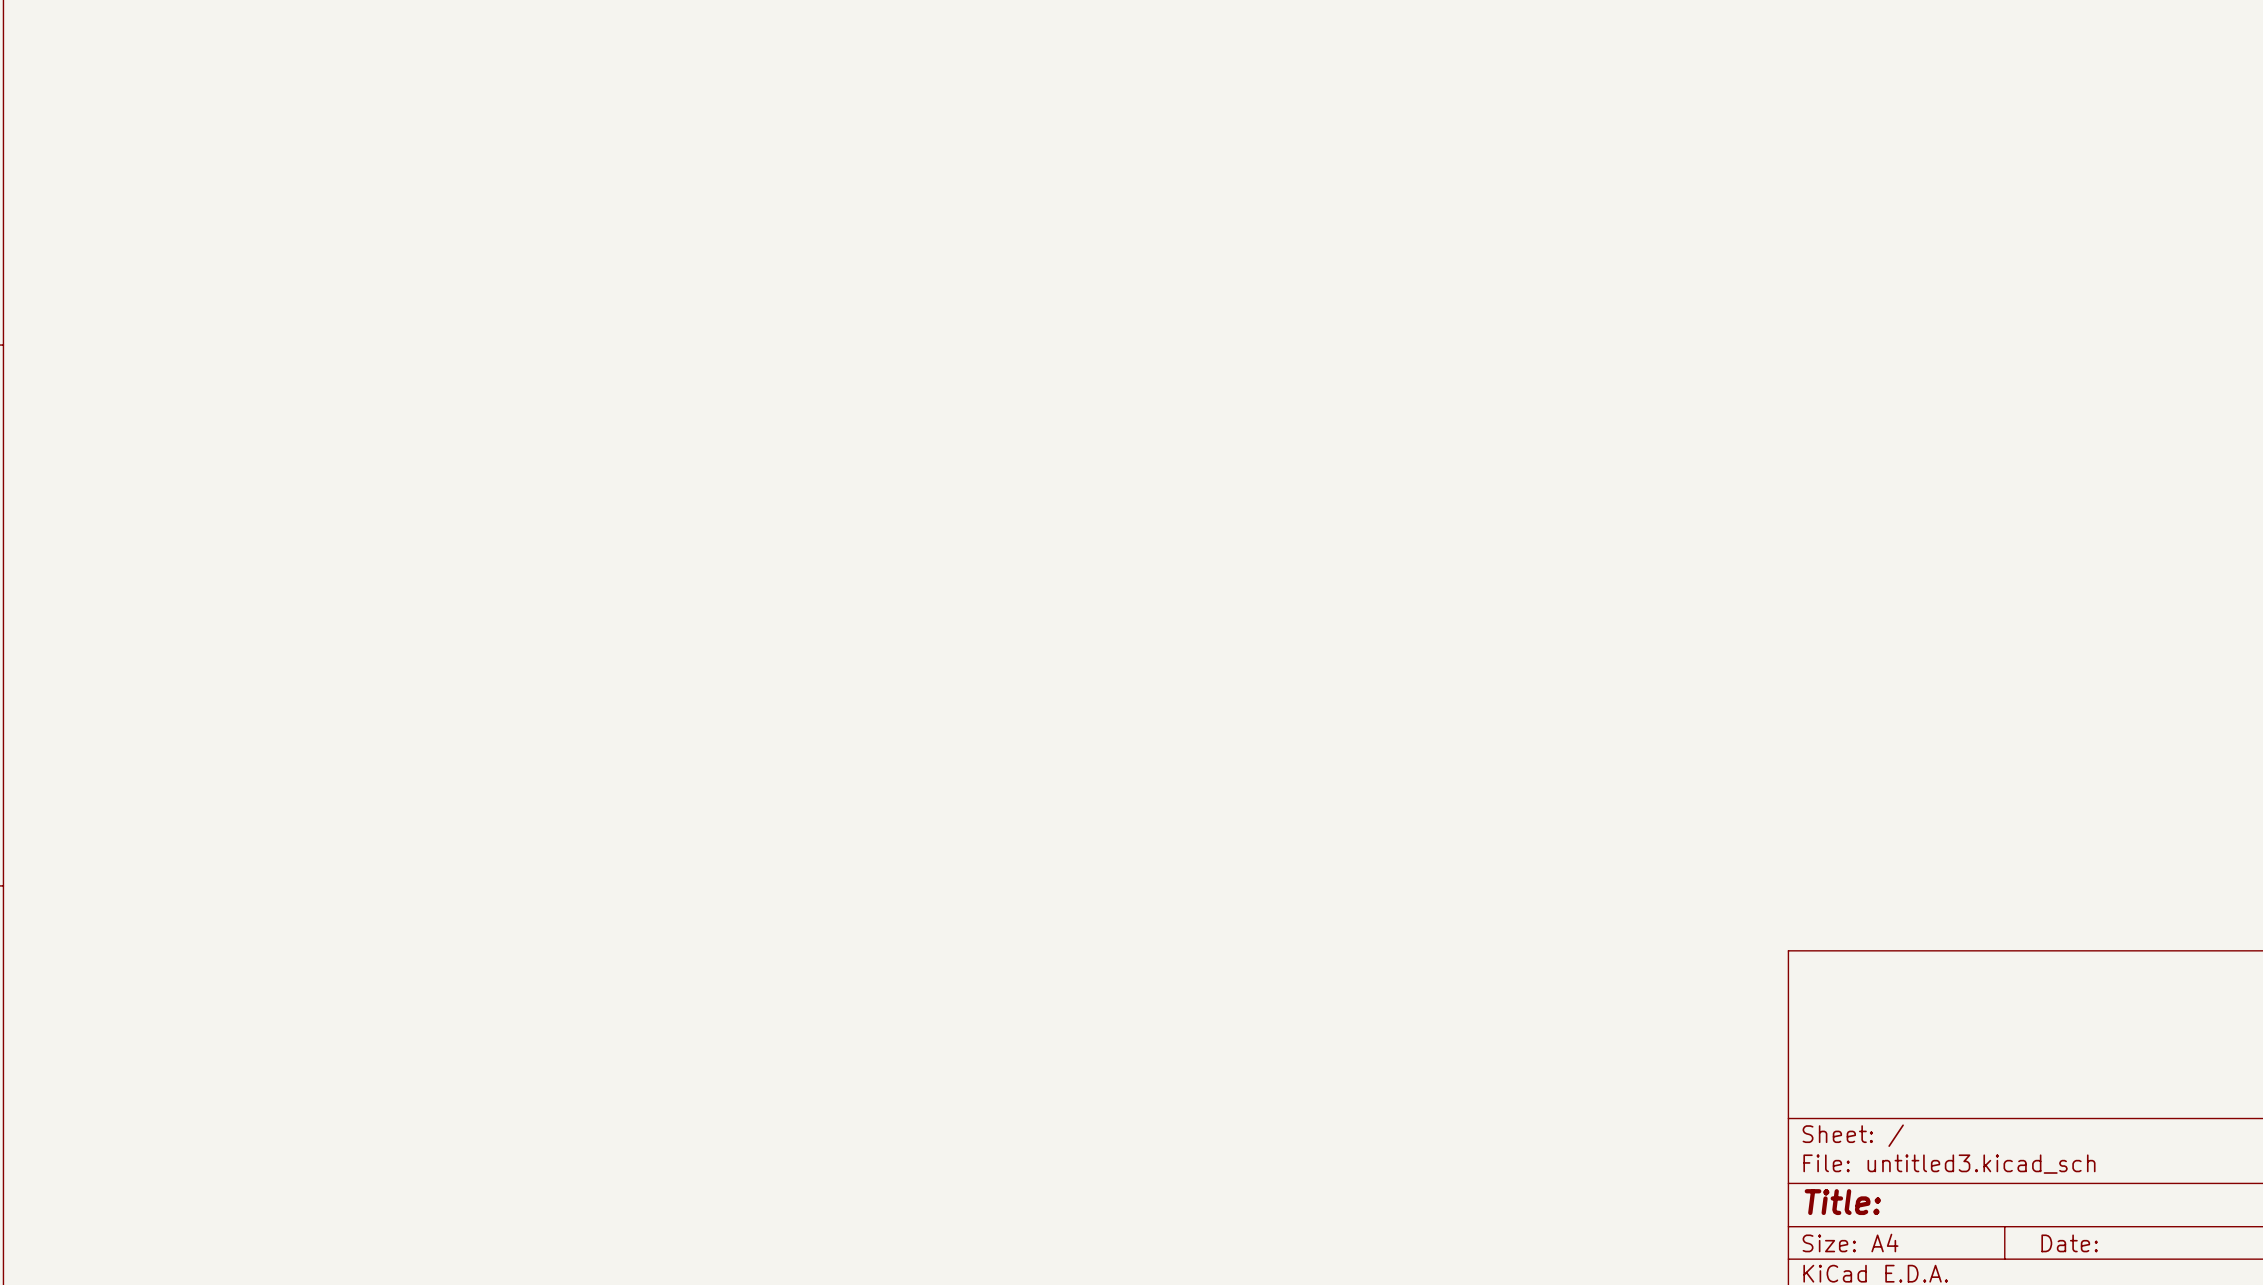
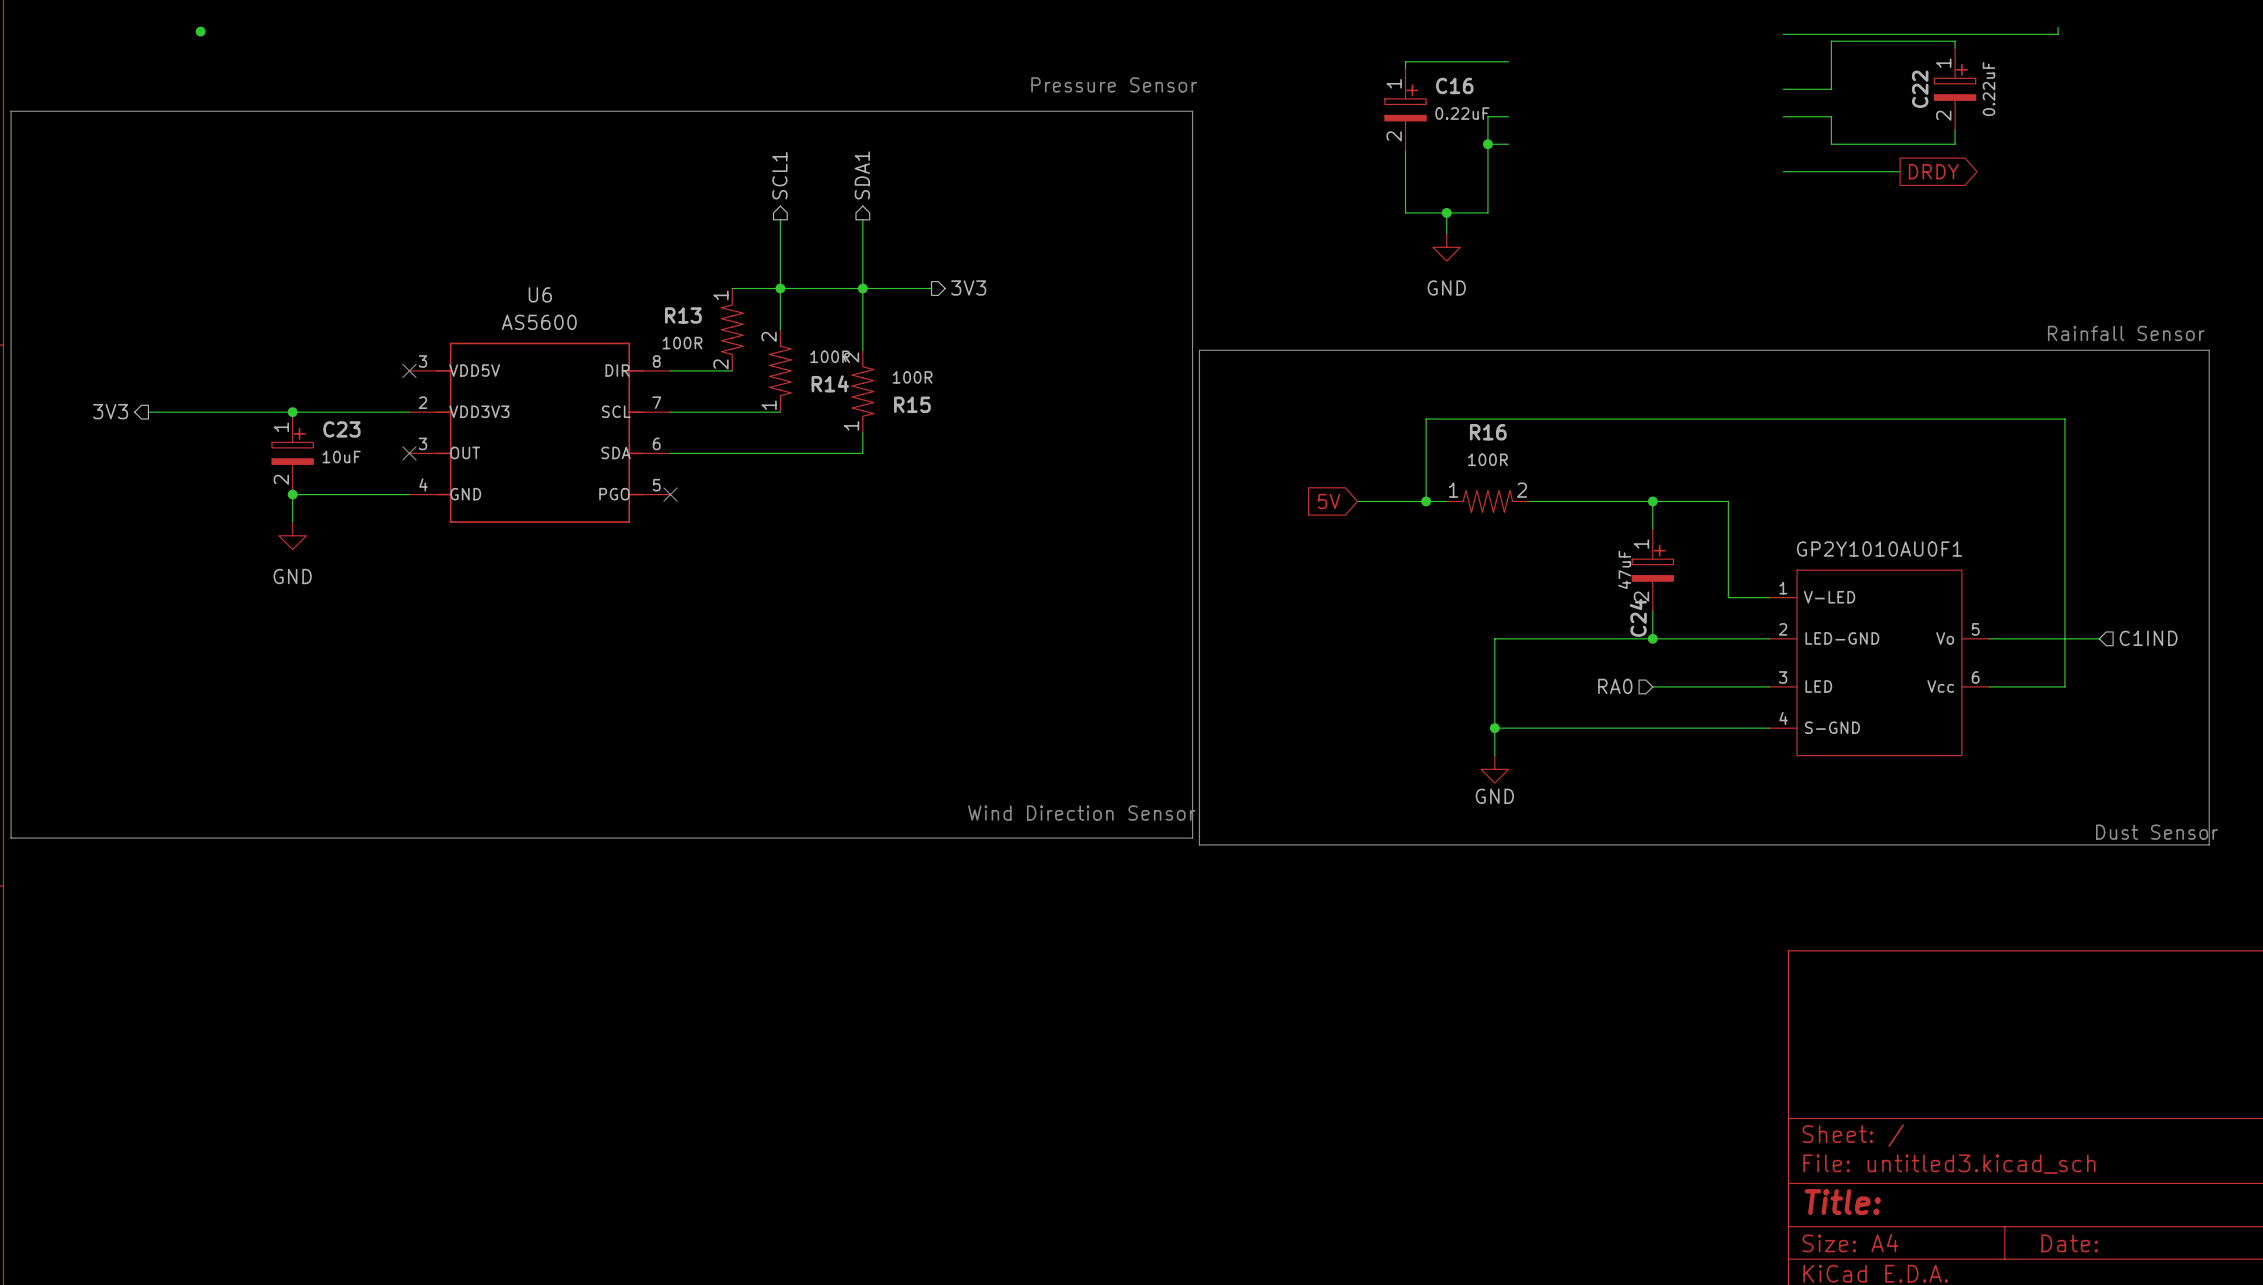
wire: none -> (2058, 27) (2058, 34) (1783, 34)
junction: none -> (200, 31)
wire: none -> (1955, 48) (1955, 41) (1831, 41) (1831, 89) (1783, 89)
wire: none -> (1508, 61) (1405, 61) (1405, 68)
text: none -> Pressure Sensor (1114, 84)
C22: none -> 0.22uF (1955, 89)
C16: none -> 0.22uF (1405, 109)
line: none -> (11, 111) (1192, 111) (1192, 838) (11, 838) (11, 111)
wire: none -> (1508, 116) (1487, 116) (1487, 212) (1405, 212) (1405, 151)
wire: none -> (1783, 116) (1831, 116) (1831, 144) (1955, 144) (1955, 130)
wire: none -> (1487, 144) (1508, 144)
junction: none -> (1487, 144)
wire: none -> (1783, 171) (1900, 171)
global label: none -> DRDY (1933, 171)
hierarchical label: none -> SCL1 (779, 175)
hierarchical label: none -> SDA1 (862, 175)
wire: none -> (1446, 212) (1446, 233)
junction: none -> (1446, 212)
wire: none -> (780, 219) (780, 329)
wire: none -> (862, 219) (862, 350)
power symbol: none -> GND (1446, 247)
hierarchical label: none -> 3V3 (968, 287)
wire: none -> (732, 288) (931, 288)
junction: none -> (780, 288)
junction: none -> (862, 288)
R13: none -> 100R (732, 329)
text: none -> Rainfall Sensor (2126, 333)
line: none -> (1199, 350) (1199, 844) (2209, 844) (2209, 350) (1199, 350)
no-connect mark: none -> (409, 370)
wire: none -> (670, 370) (732, 370)
R14: none -> 100R (780, 370)
R15: none -> 100R (862, 391)
hierarchical label: none -> 3V3 (110, 411)
wire: none -> (148, 412) (409, 412)
junction: none -> (292, 412)
wire: none -> (670, 412) (780, 412)
U6: none -> AS5600 (539, 432)
wire: none -> (862, 432) (862, 453) (670, 453)
C23: none -> 10uF (292, 453)
no-connect mark: none -> (409, 453)
junction: none -> (292, 494)
wire: none -> (409, 494) (292, 494) (292, 522)
no-connect mark: none -> (670, 494)
global label: none -> 5V (1329, 501)
wire: none -> (1357, 501) (1446, 501)
wire: none -> (1426, 501) (1426, 419) (2064, 419) (2064, 686) (1989, 686)
junction: none -> (1426, 501)
R16: none -> 100R (1487, 501)
wire: none -> (1529, 501) (1728, 501) (1728, 597) (1769, 597)
wire: none -> (1652, 501) (1652, 528)
junction: none -> (1652, 501)
power symbol: none -> GND (292, 535)
C24: none -> 47uF (1652, 570)
wire: none -> (1652, 611) (1652, 638)
junction: none -> (1652, 638)
wire: none -> (1769, 638) (1494, 638) (1494, 755)
wire: none -> (1989, 638) (2099, 638)
hierarchical label: none -> C1IND (2148, 638)
GP2Y1010AU0F1: none -> (1879, 662)
hierarchical label: none -> RA0 (1615, 686)
wire: none -> (1652, 686) (1769, 686)
wire: none -> (1494, 728) (1769, 728)
junction: none -> (1494, 728)
power symbol: none -> GND (1494, 769)
text: none -> Wind Direction Sensor (1081, 813)
text: none -> Dust Sensor (2157, 832)

